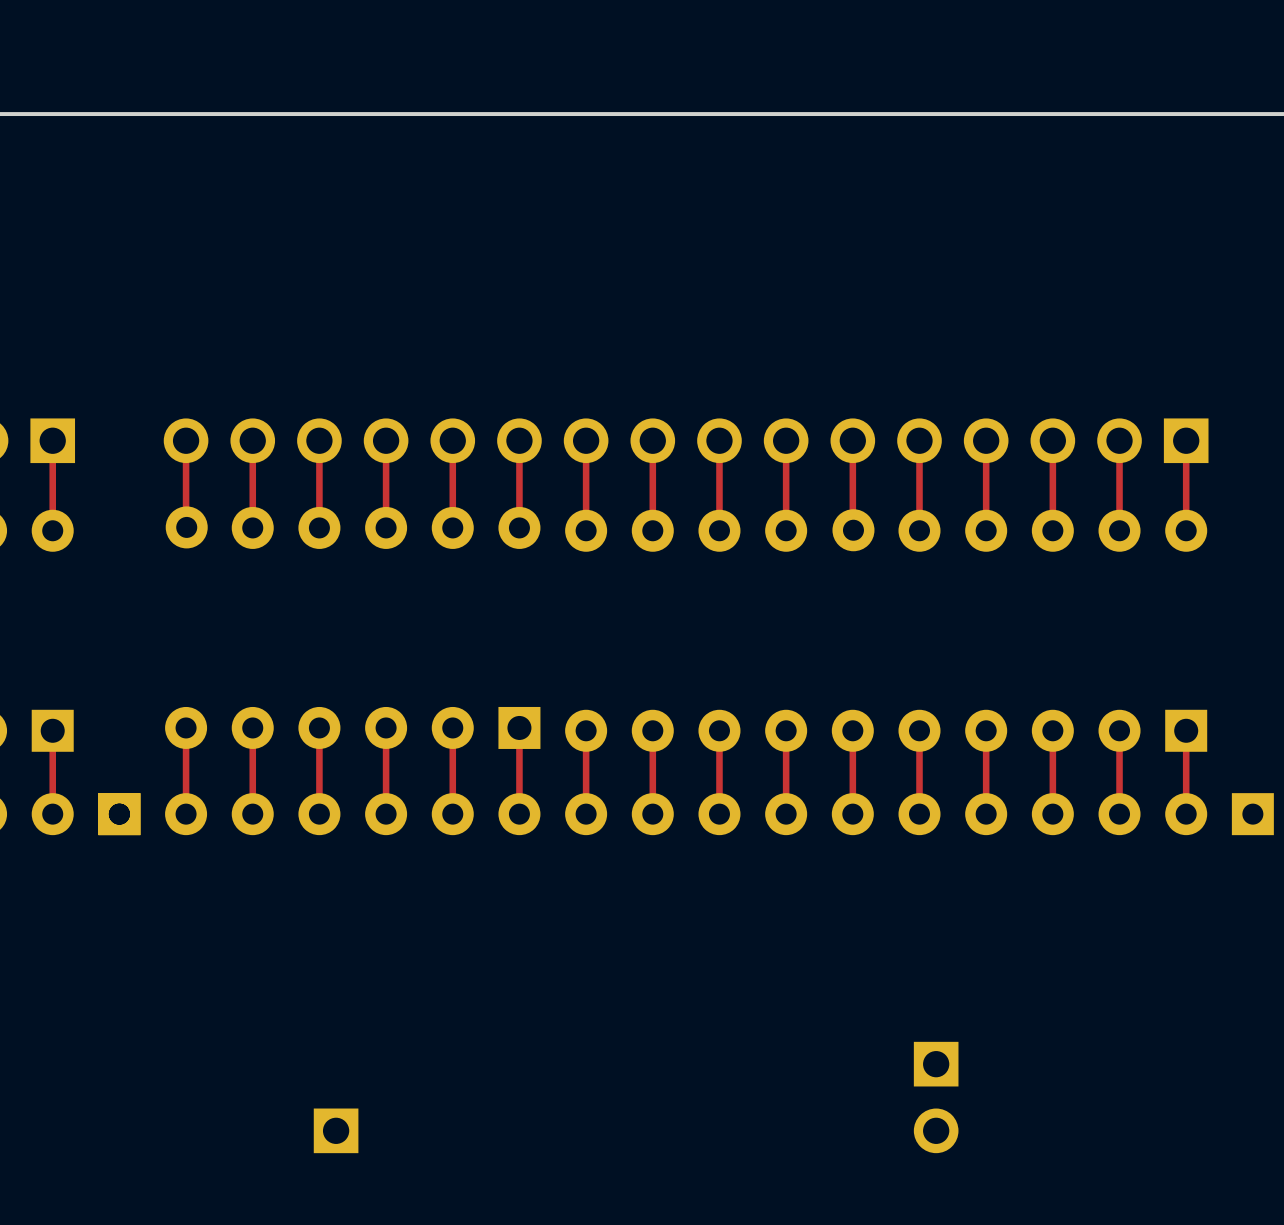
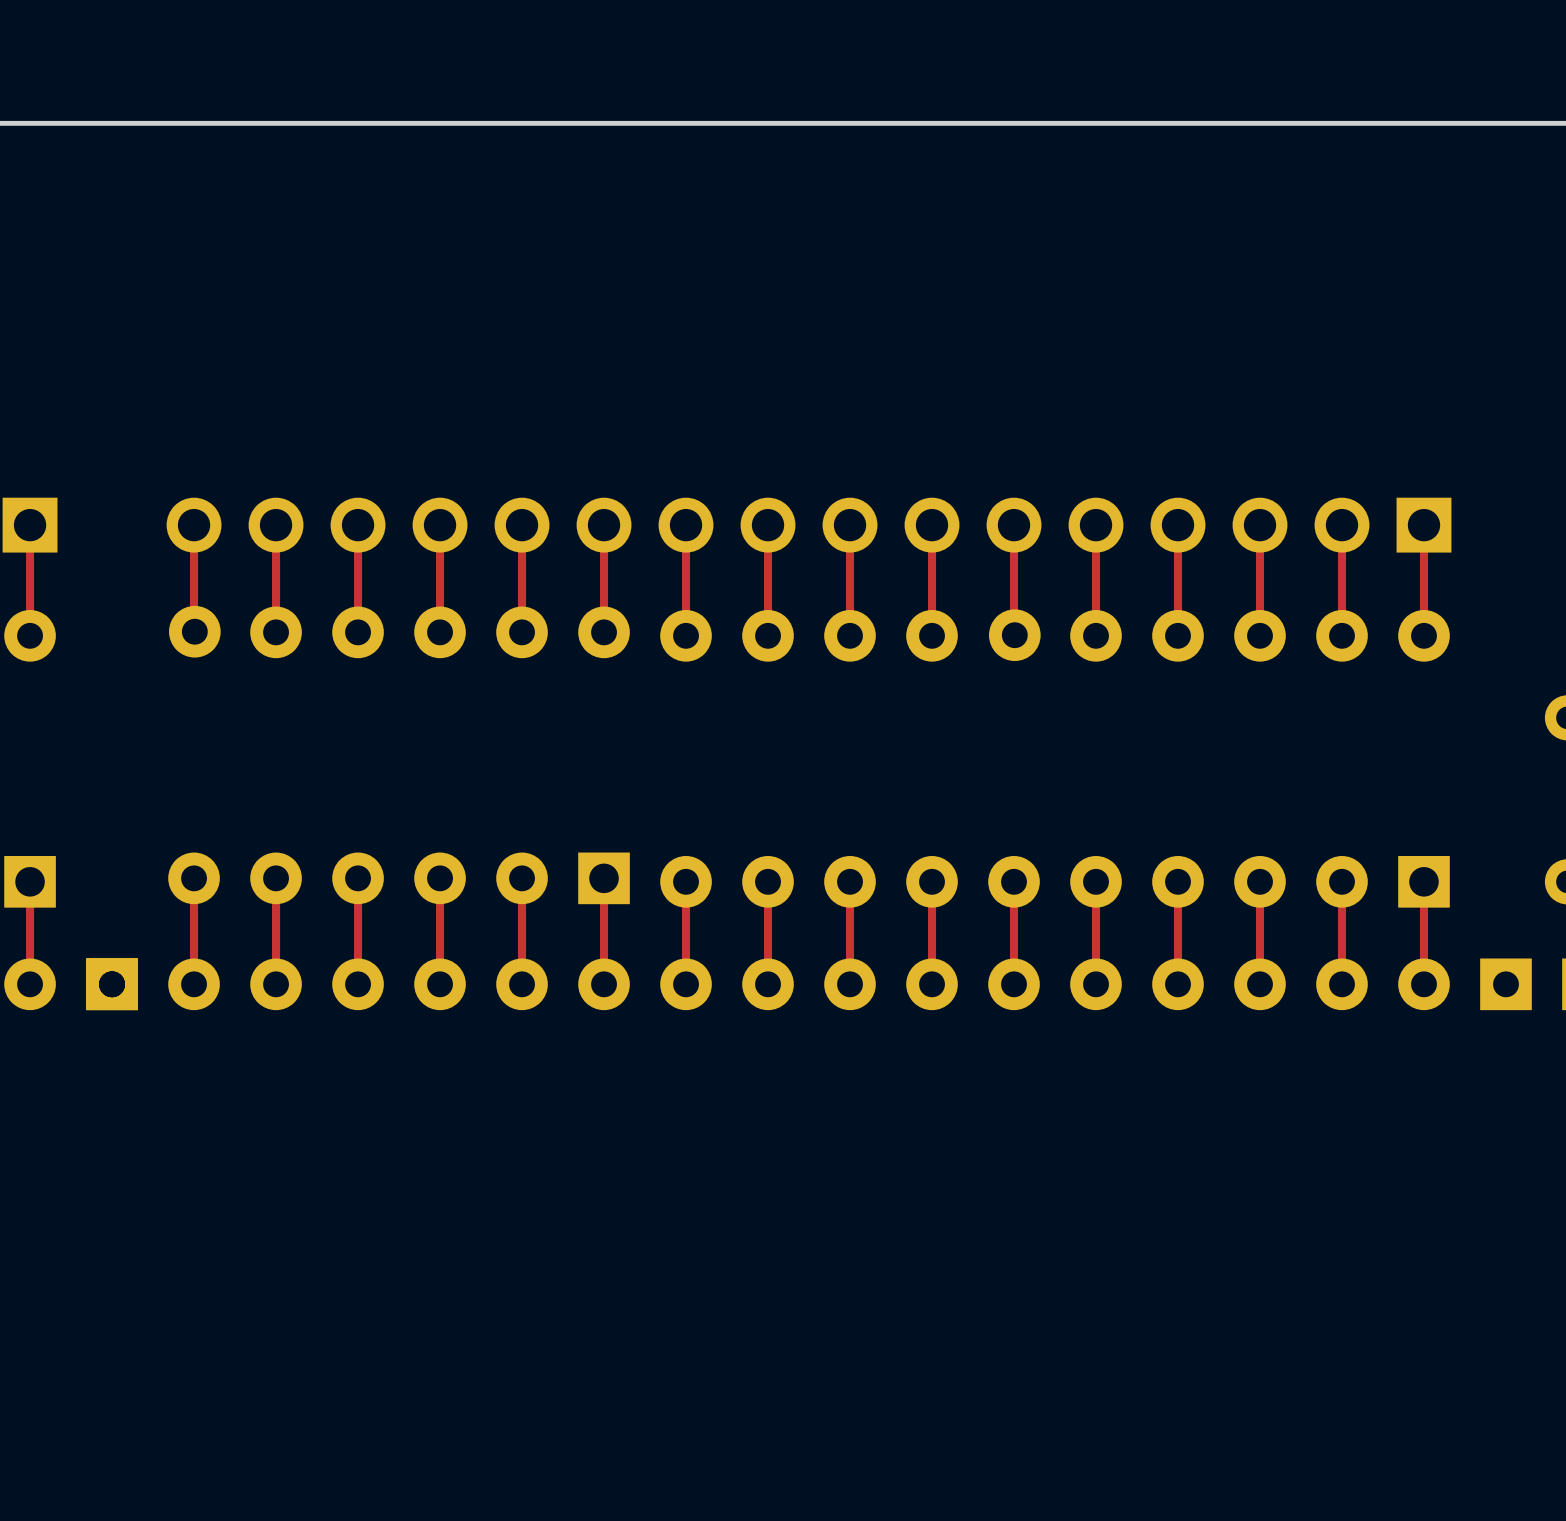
part: (936, 1097) -> none
part: (336, 1130) -> none

